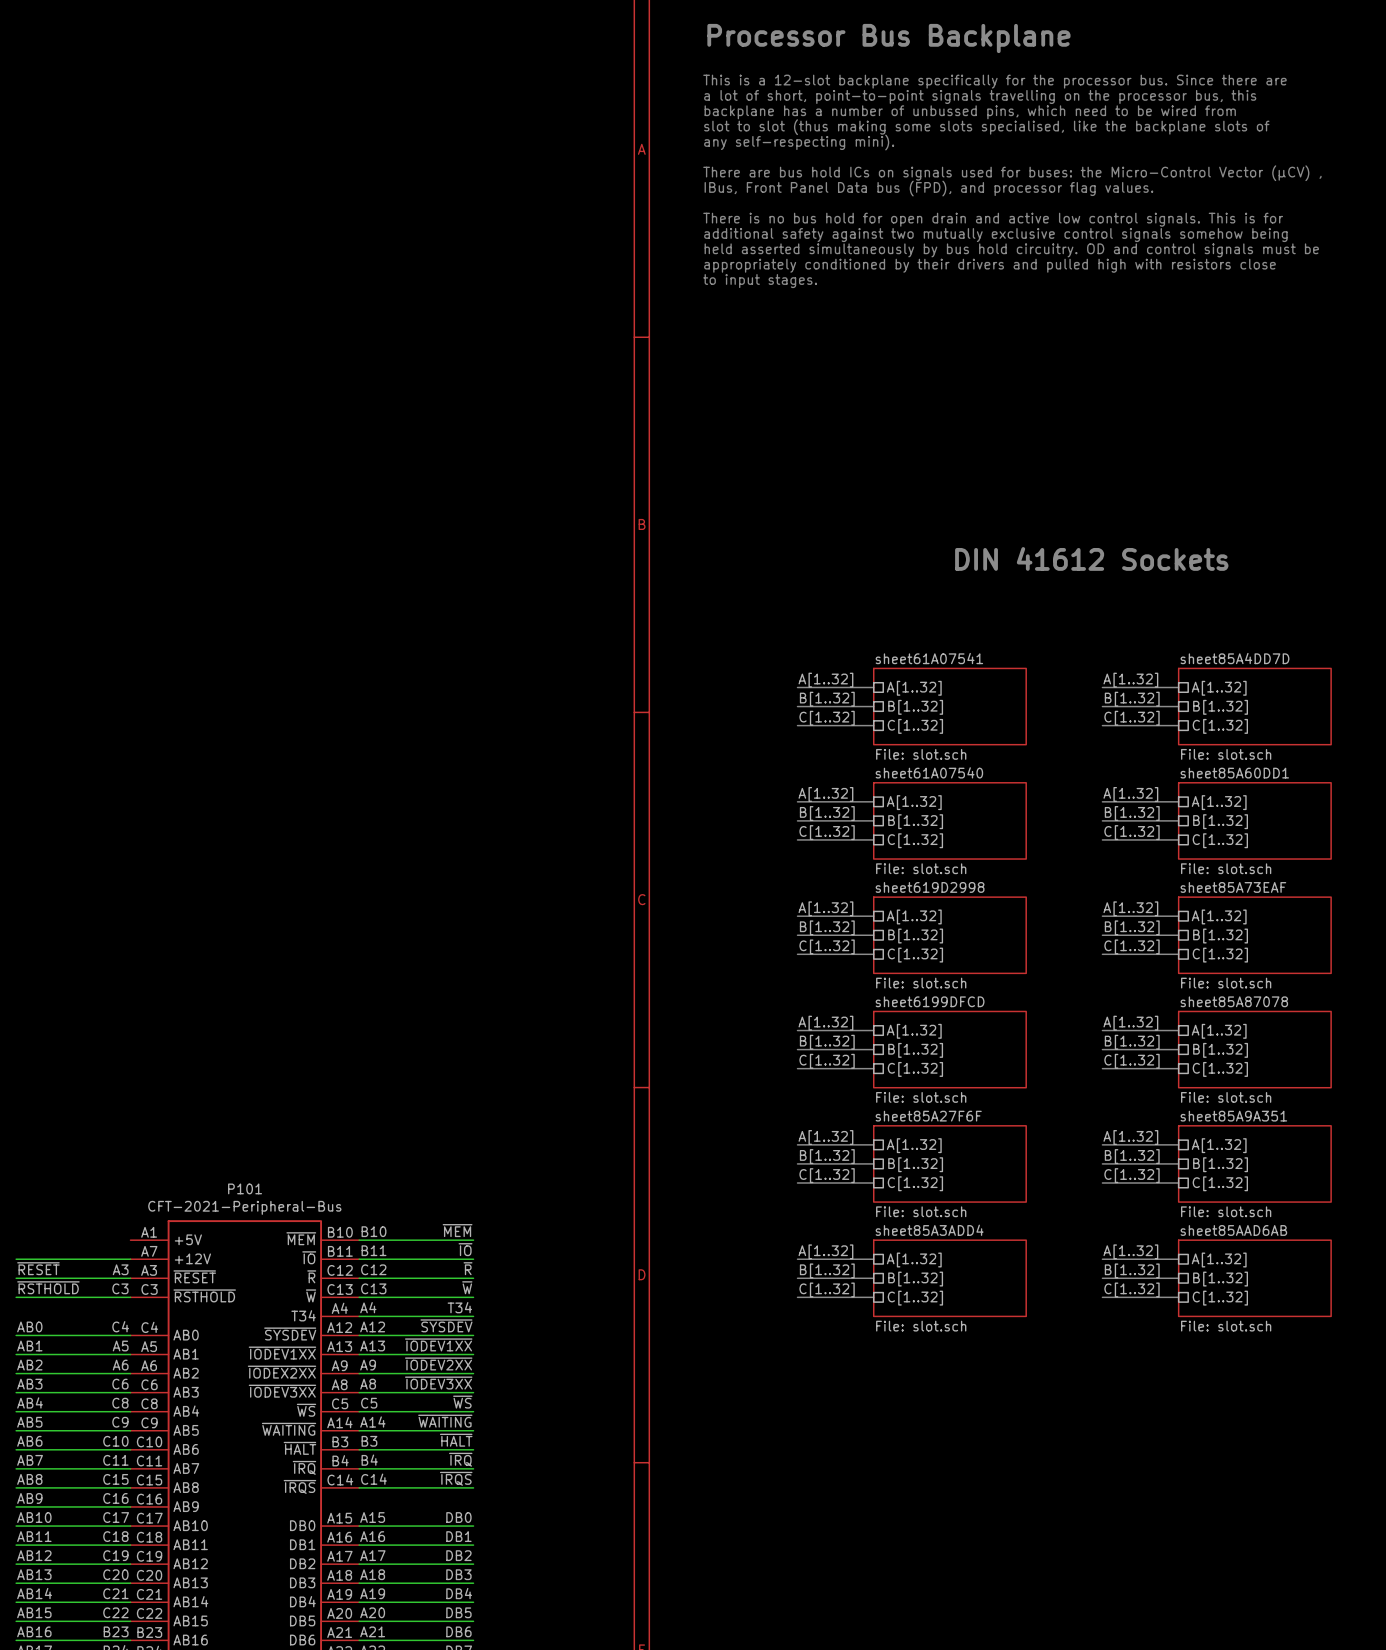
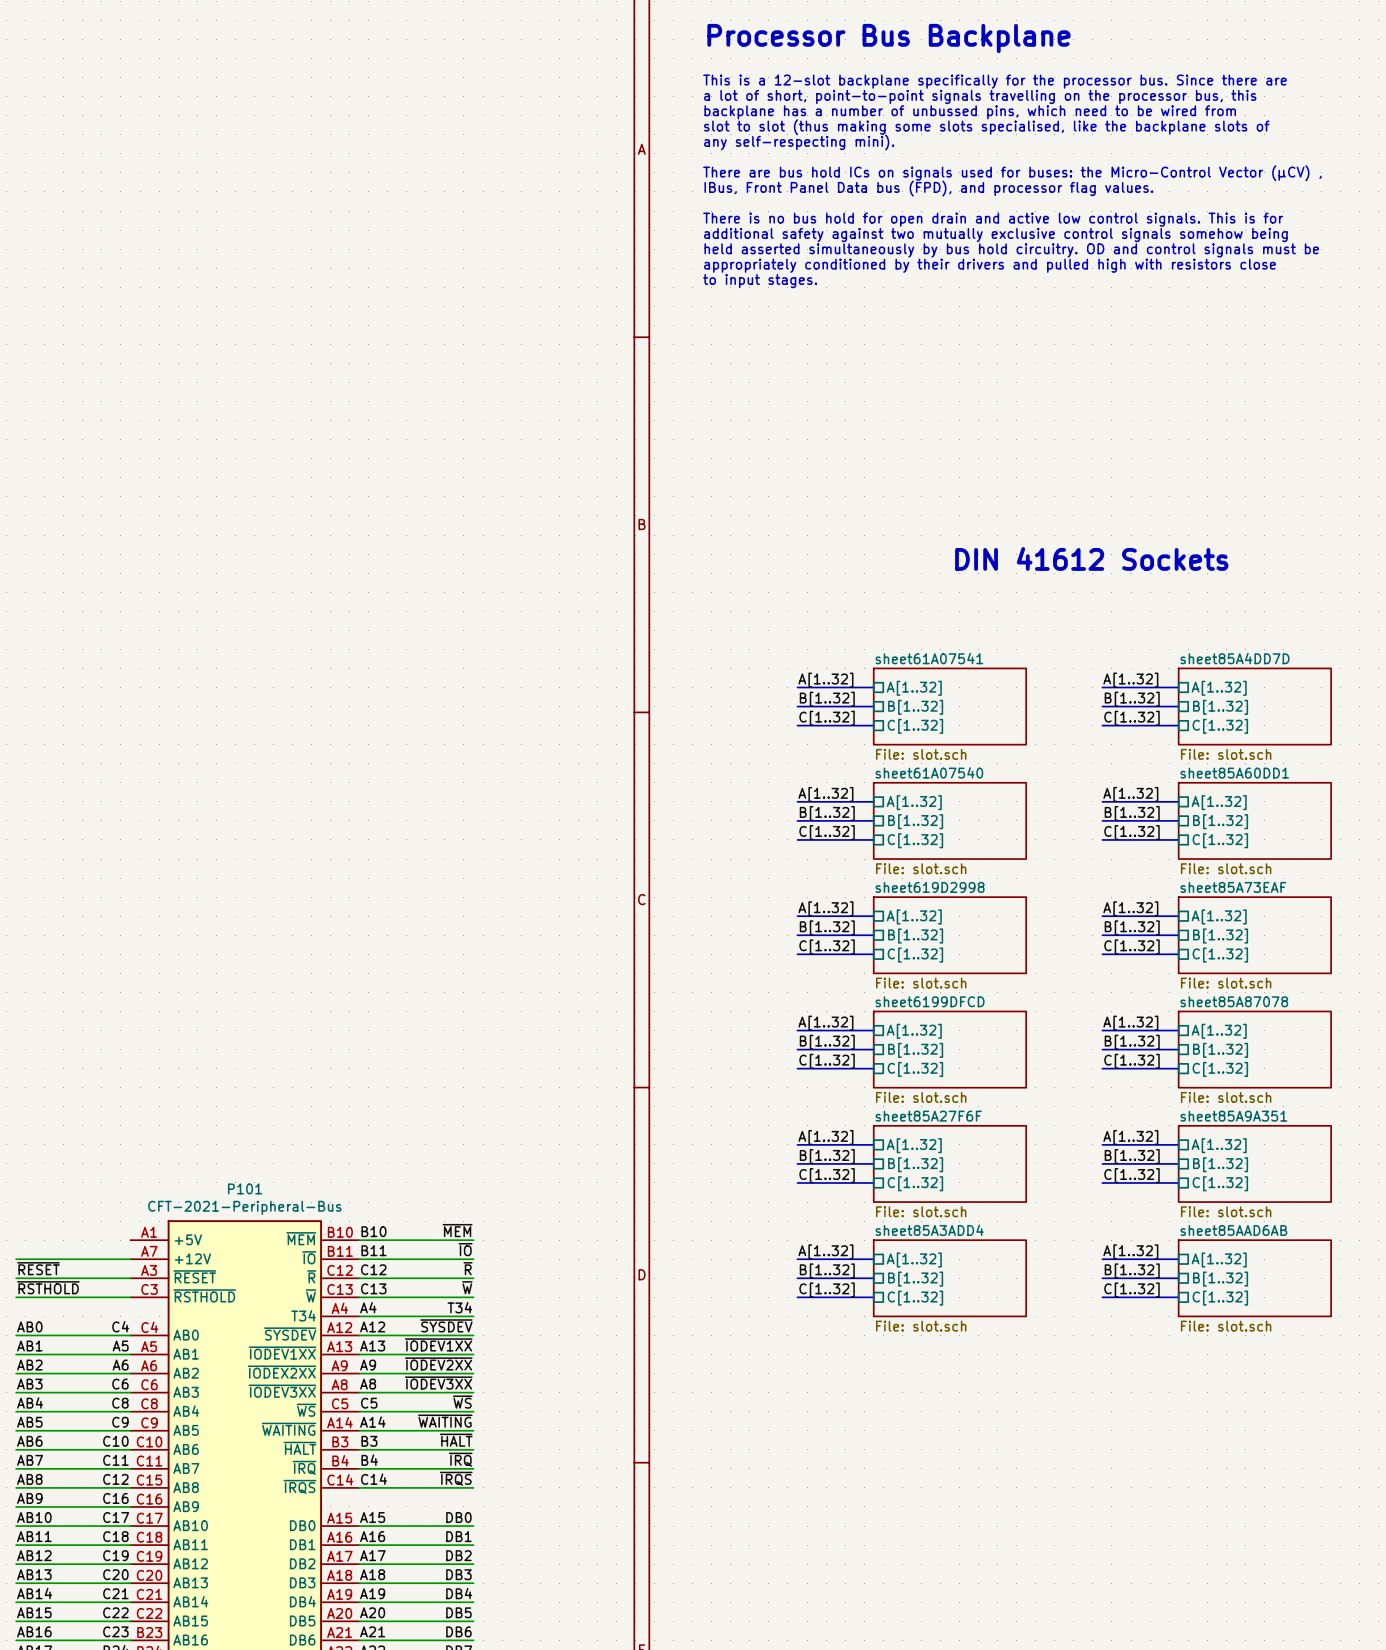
label: A3 (120, 1269) -> none
label: C3 (120, 1288) -> none
label: C15 (115, 1479) -> C12 (115, 1479)
label: B23 (116, 1631) -> C23 (115, 1631)

